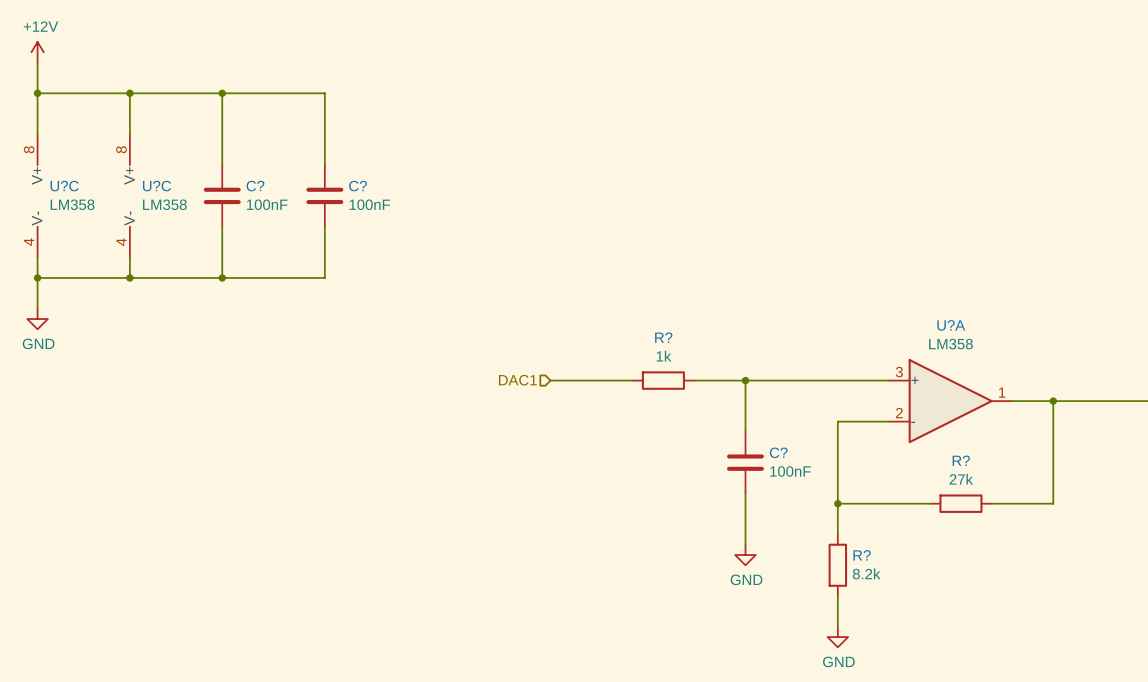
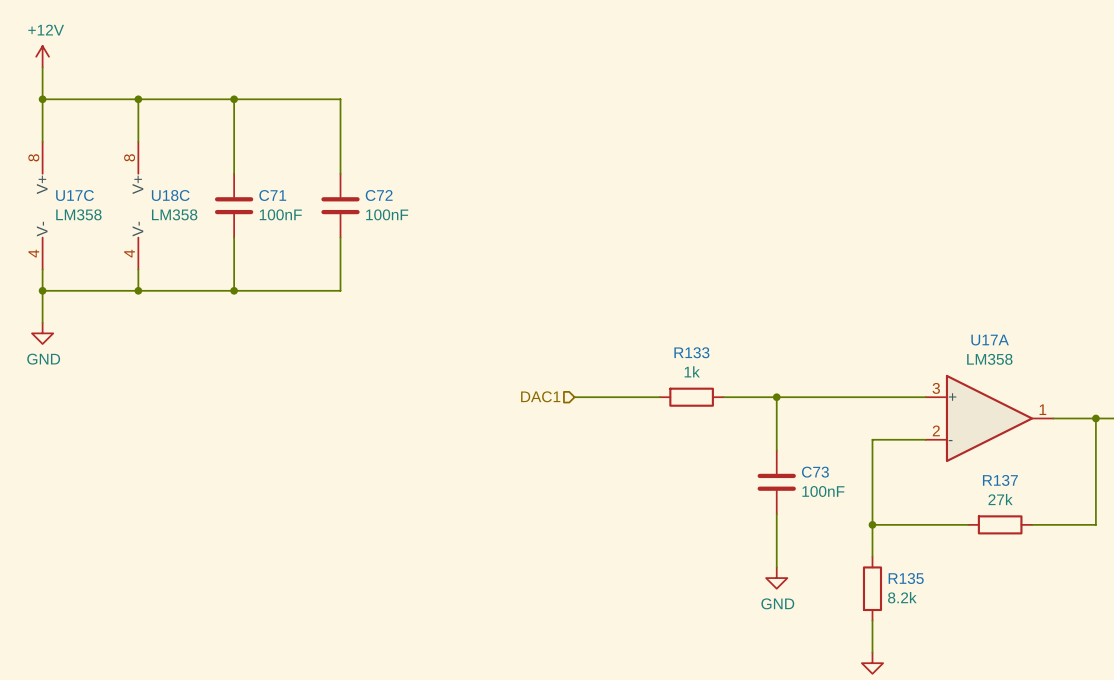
U?C name: U?C (64, 186) -> U17C (75, 195)
U?C name: U?C (157, 186) -> U18C (170, 195)
C? name: C? (255, 186) -> C71 (272, 195)
C? name: C? (358, 186) -> C72 (379, 195)
U?A name: U?A (951, 325) -> U17A (990, 340)
R? name: R? (663, 337) -> R133 (691, 352)
C? name: C? (778, 452) -> C73 (815, 472)
R? name: R? (961, 460) -> R137 (1000, 480)
R? name: R? (862, 555) -> R135 (906, 578)

